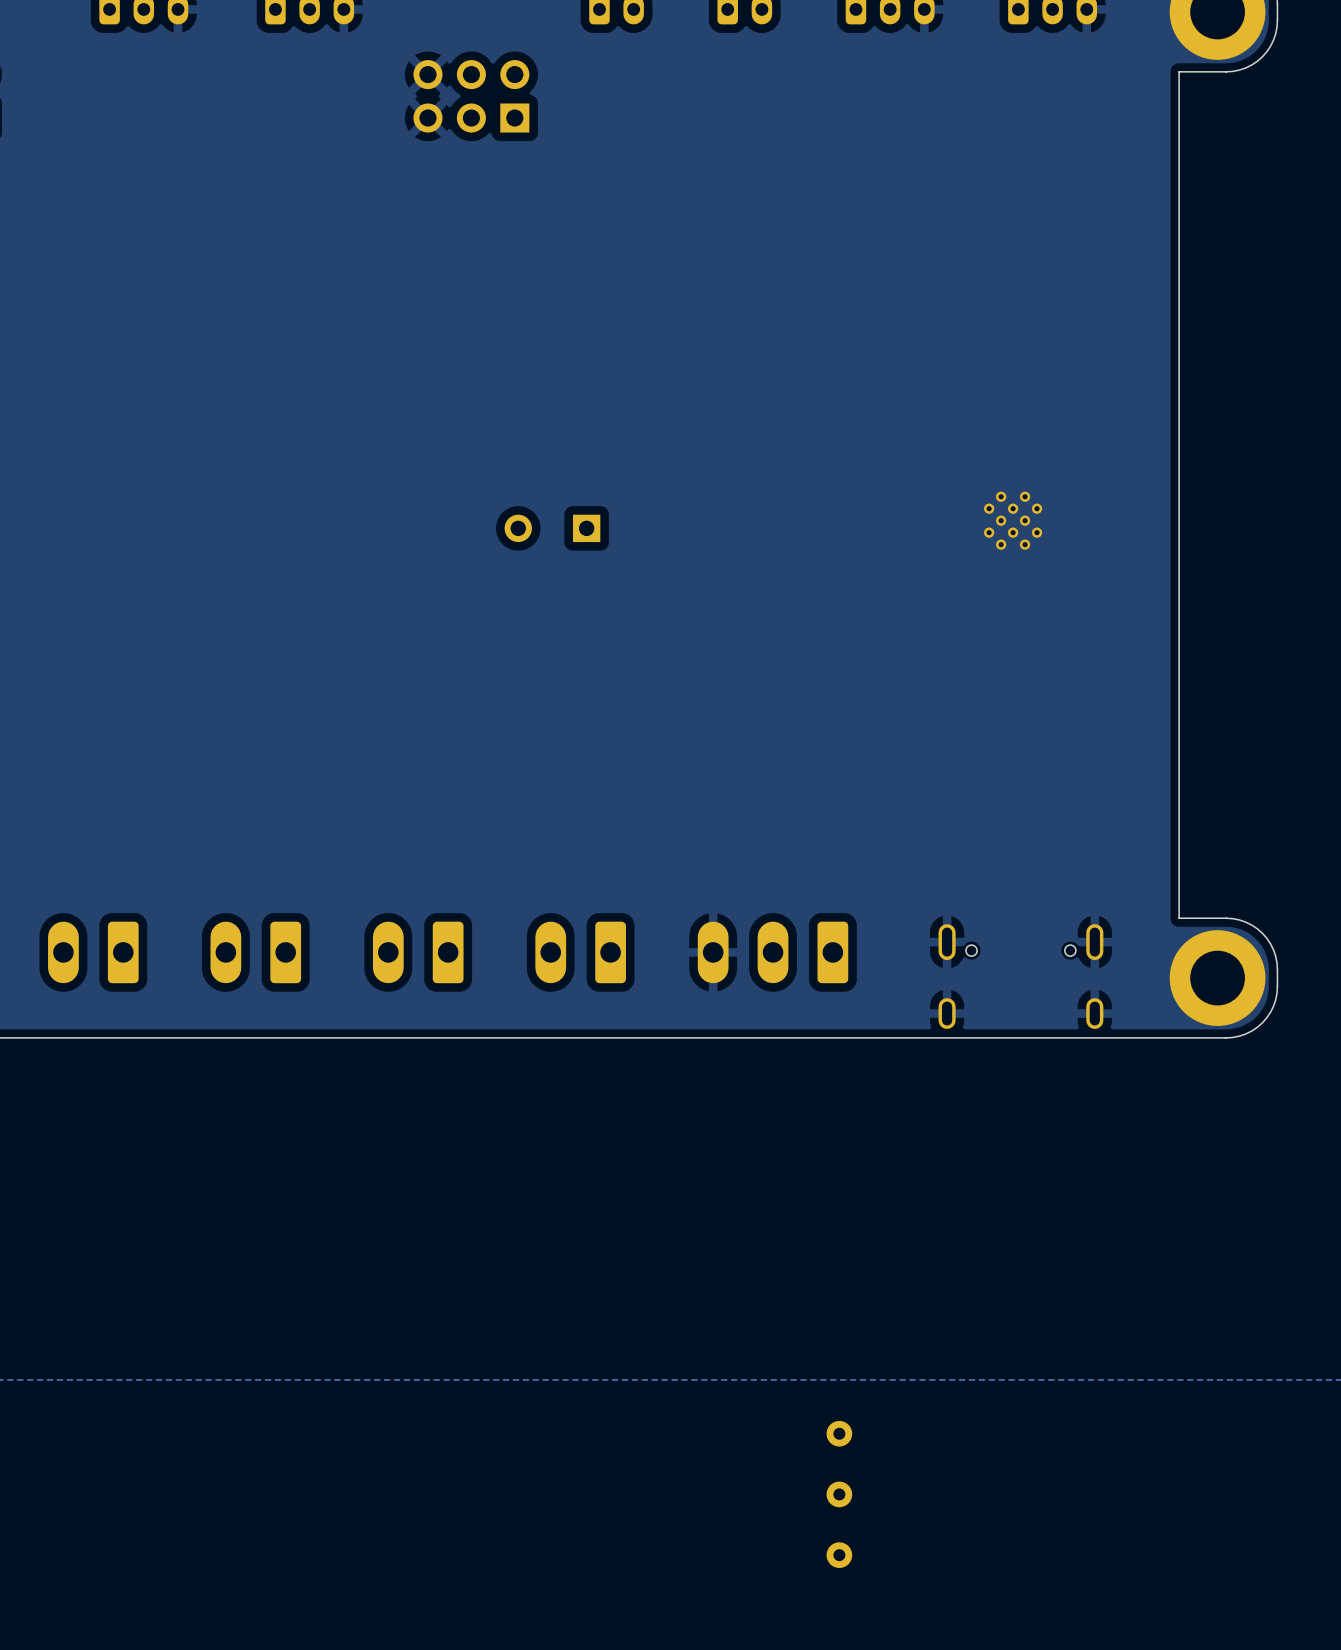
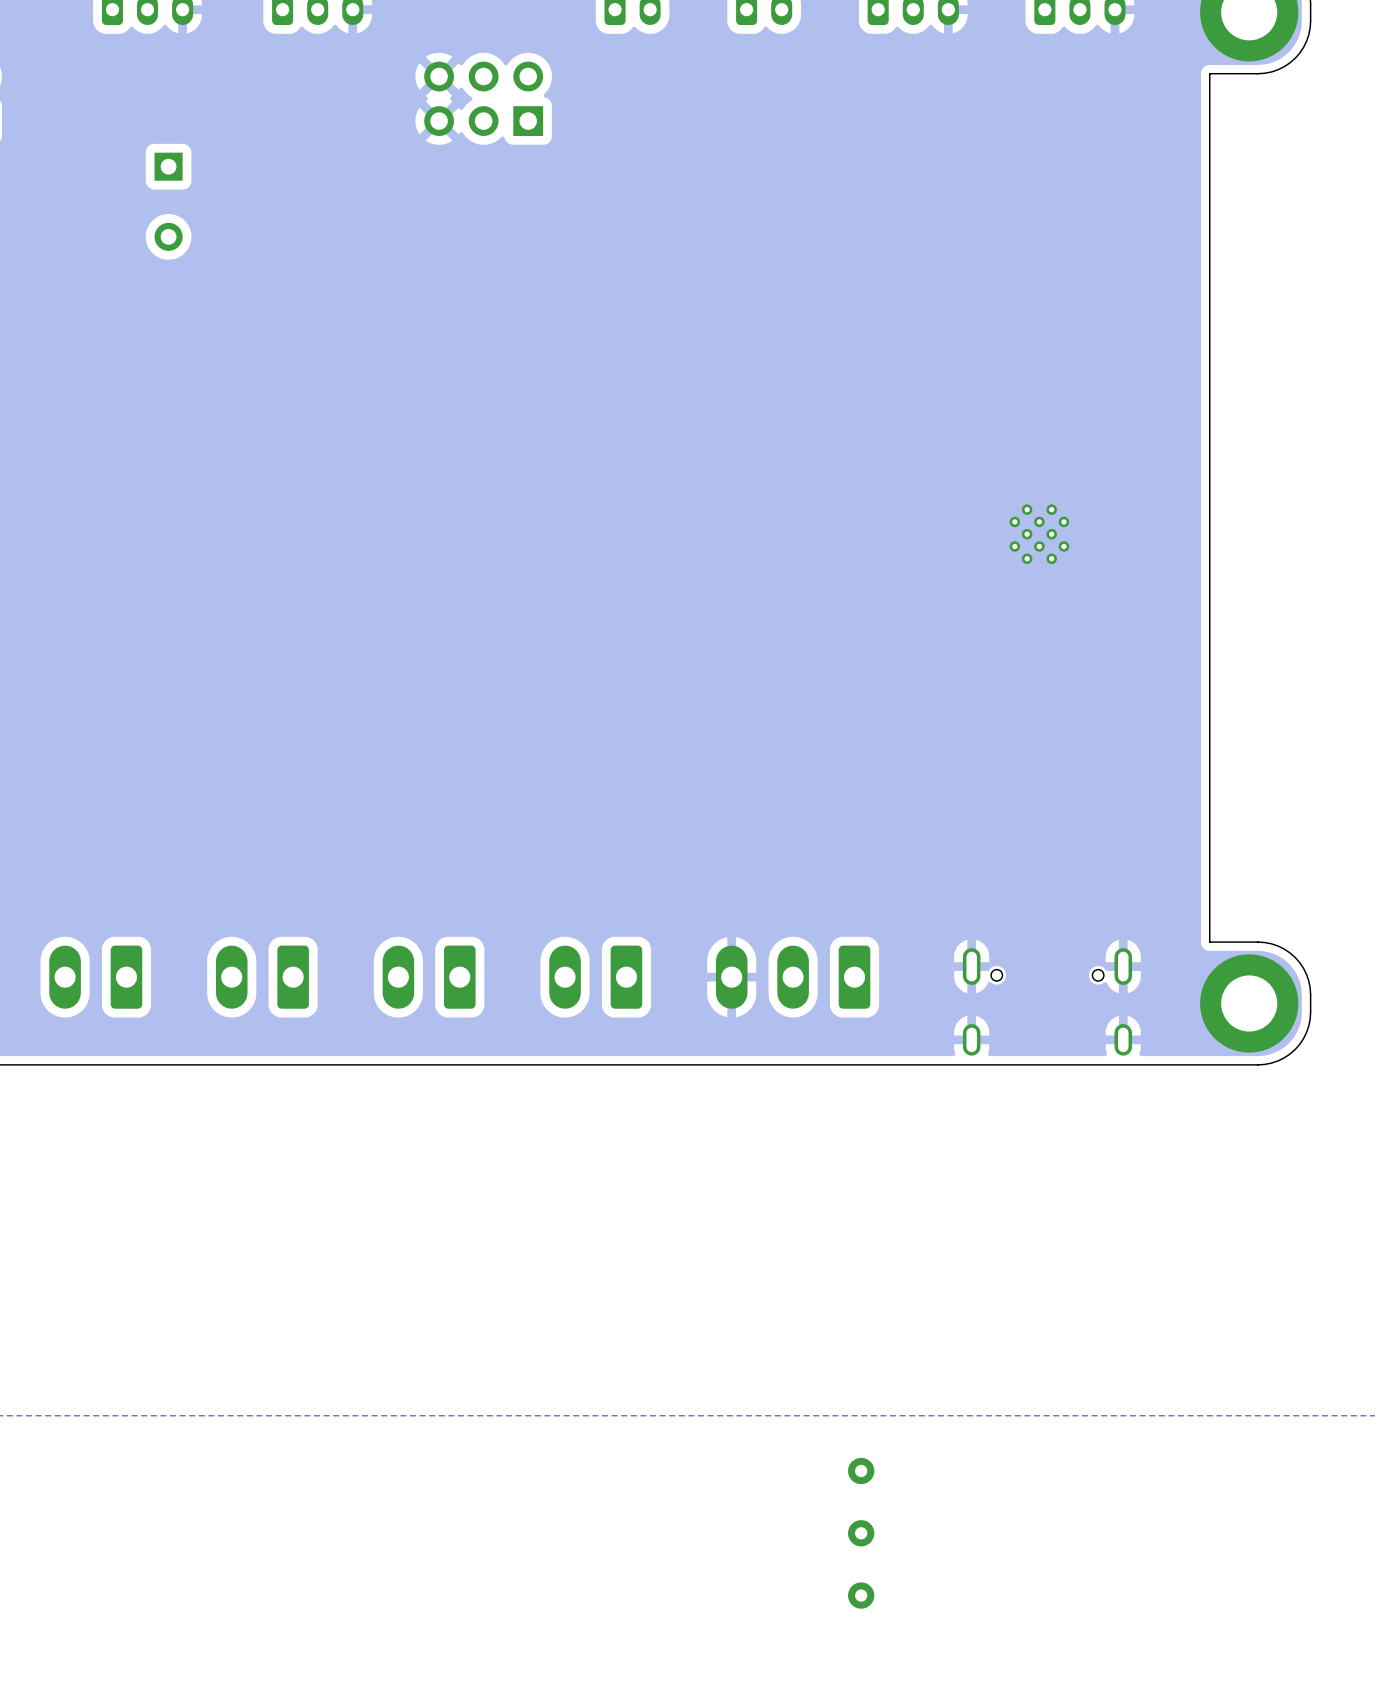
part: none -> (168, 201)
part: (552, 528) -> none

